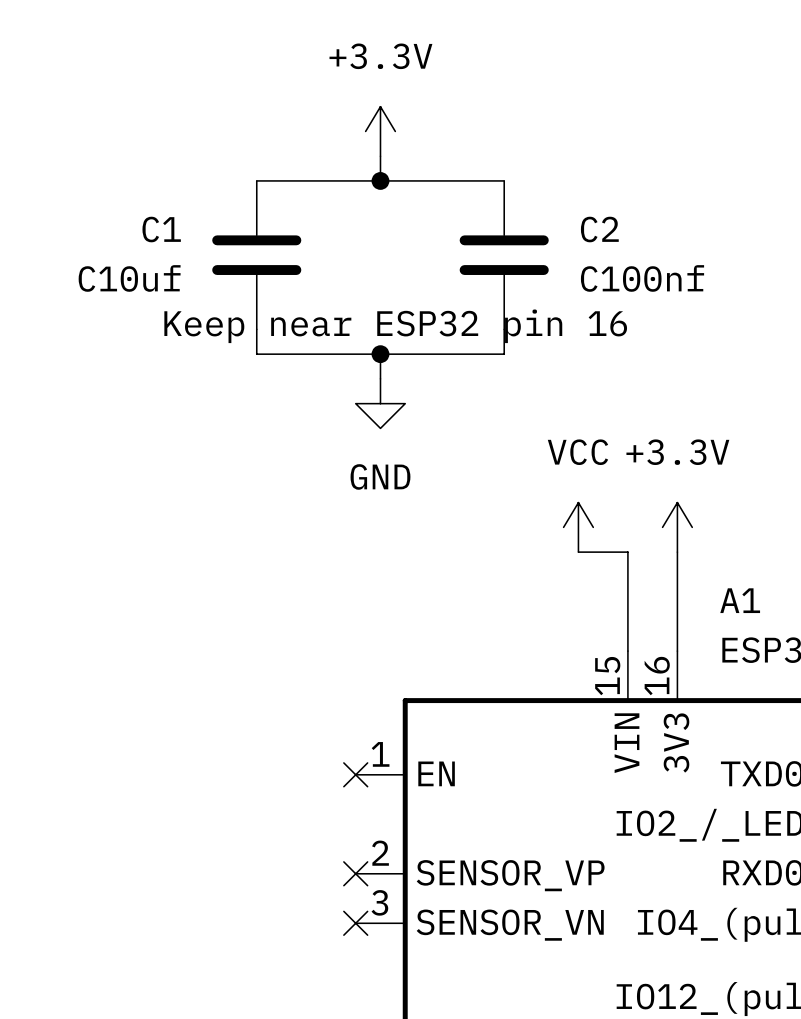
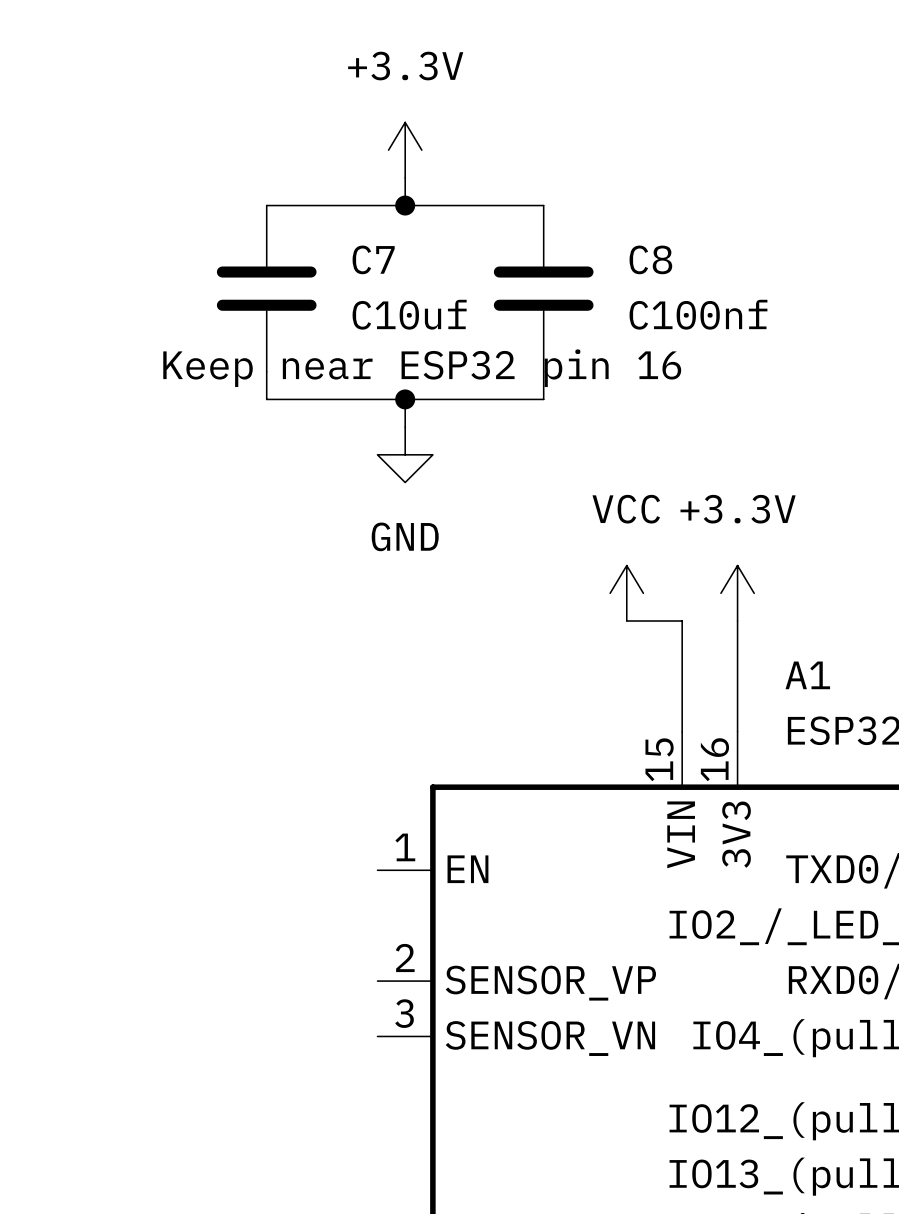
C1 name: C1 (161, 229) -> C7 (373, 259)
C2 name: C2 (599, 229) -> C8 (650, 259)
C1 value position: C10uf (129, 278) -> C10uf (409, 314)
no-connect mark: (355, 774) -> none
no-connect mark: (355, 873) -> none
no-connect mark: (355, 923) -> none

